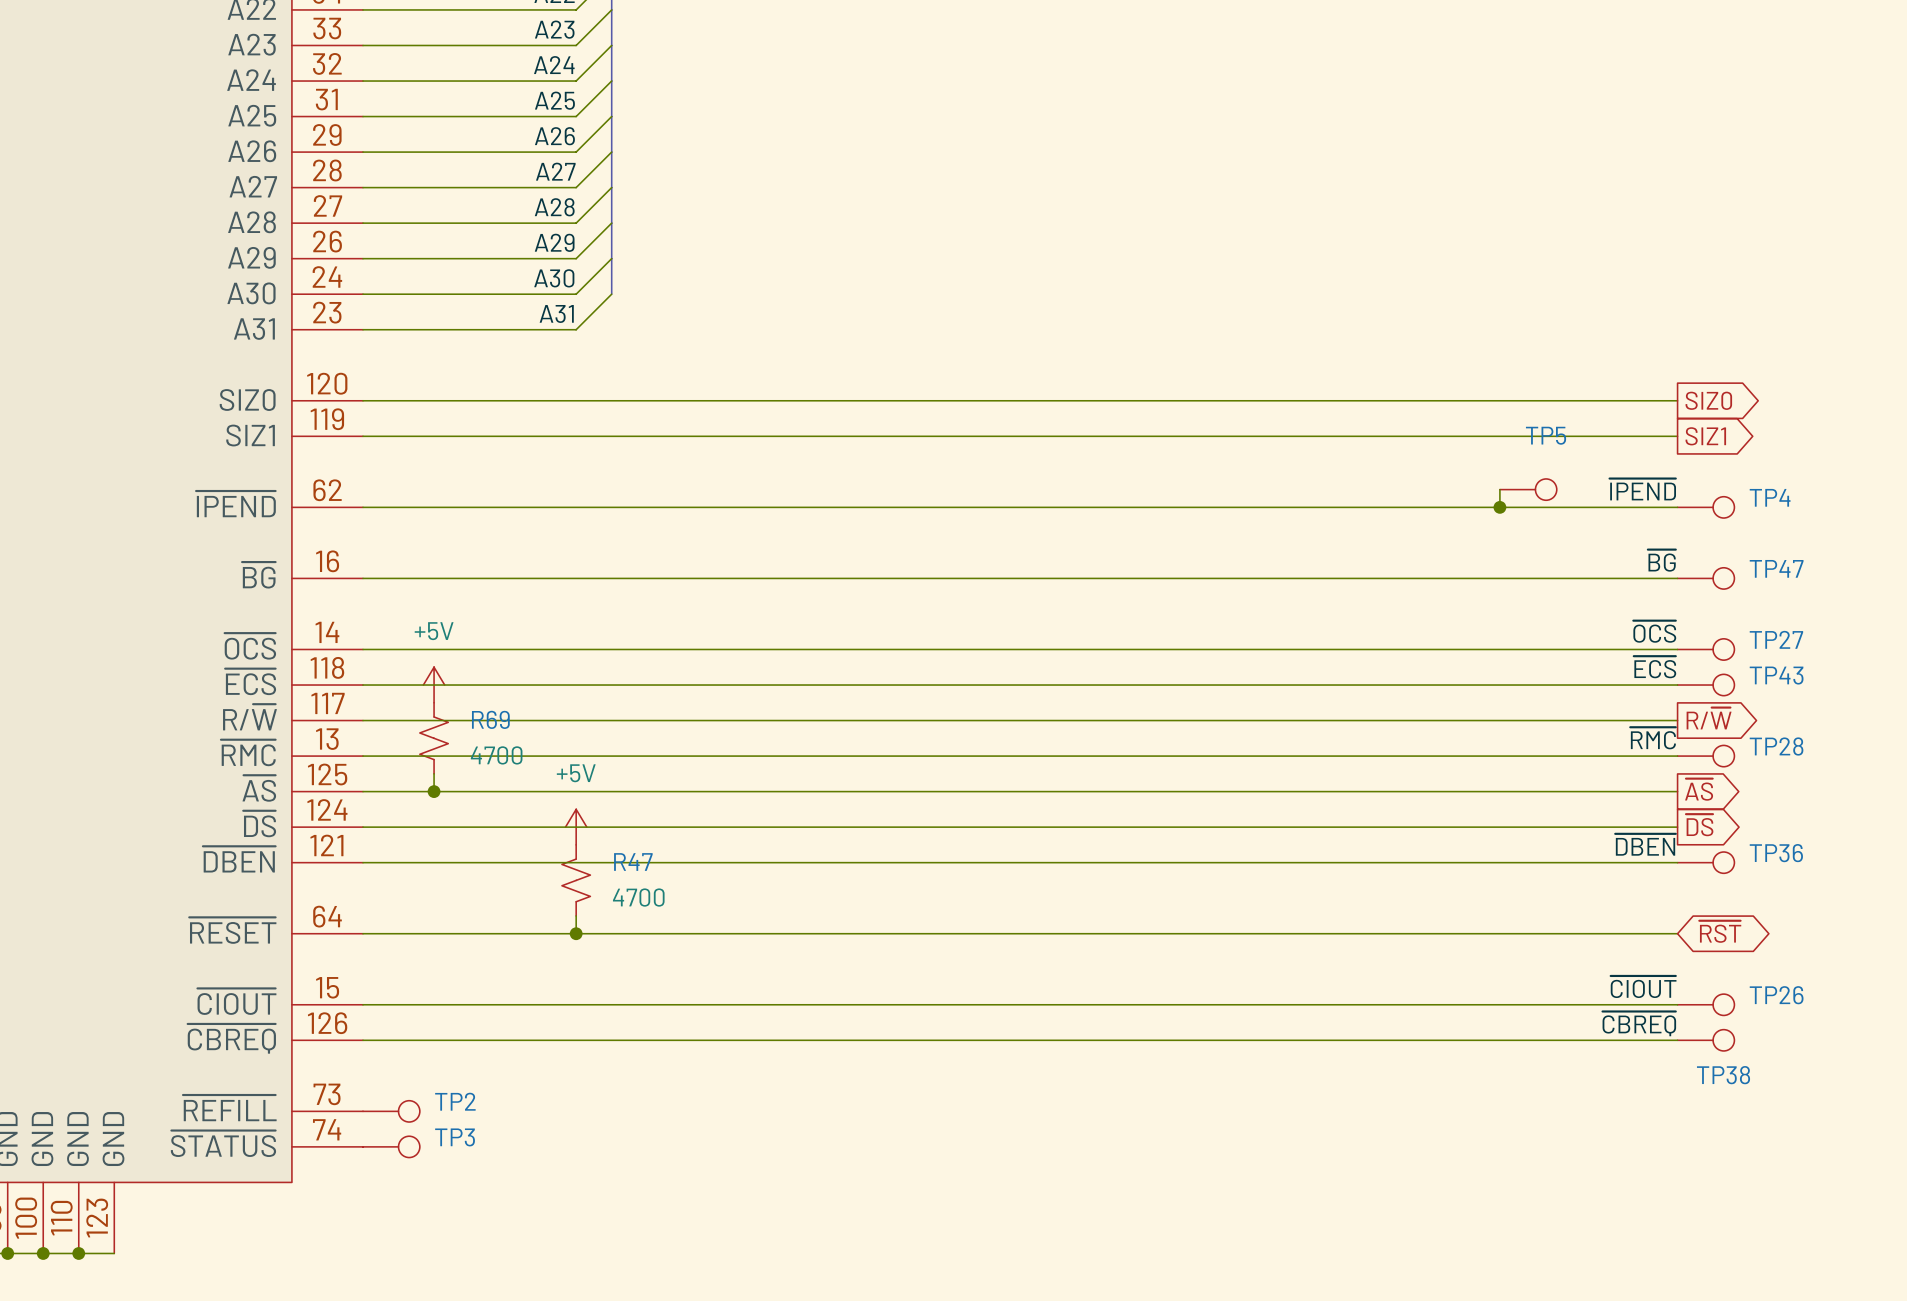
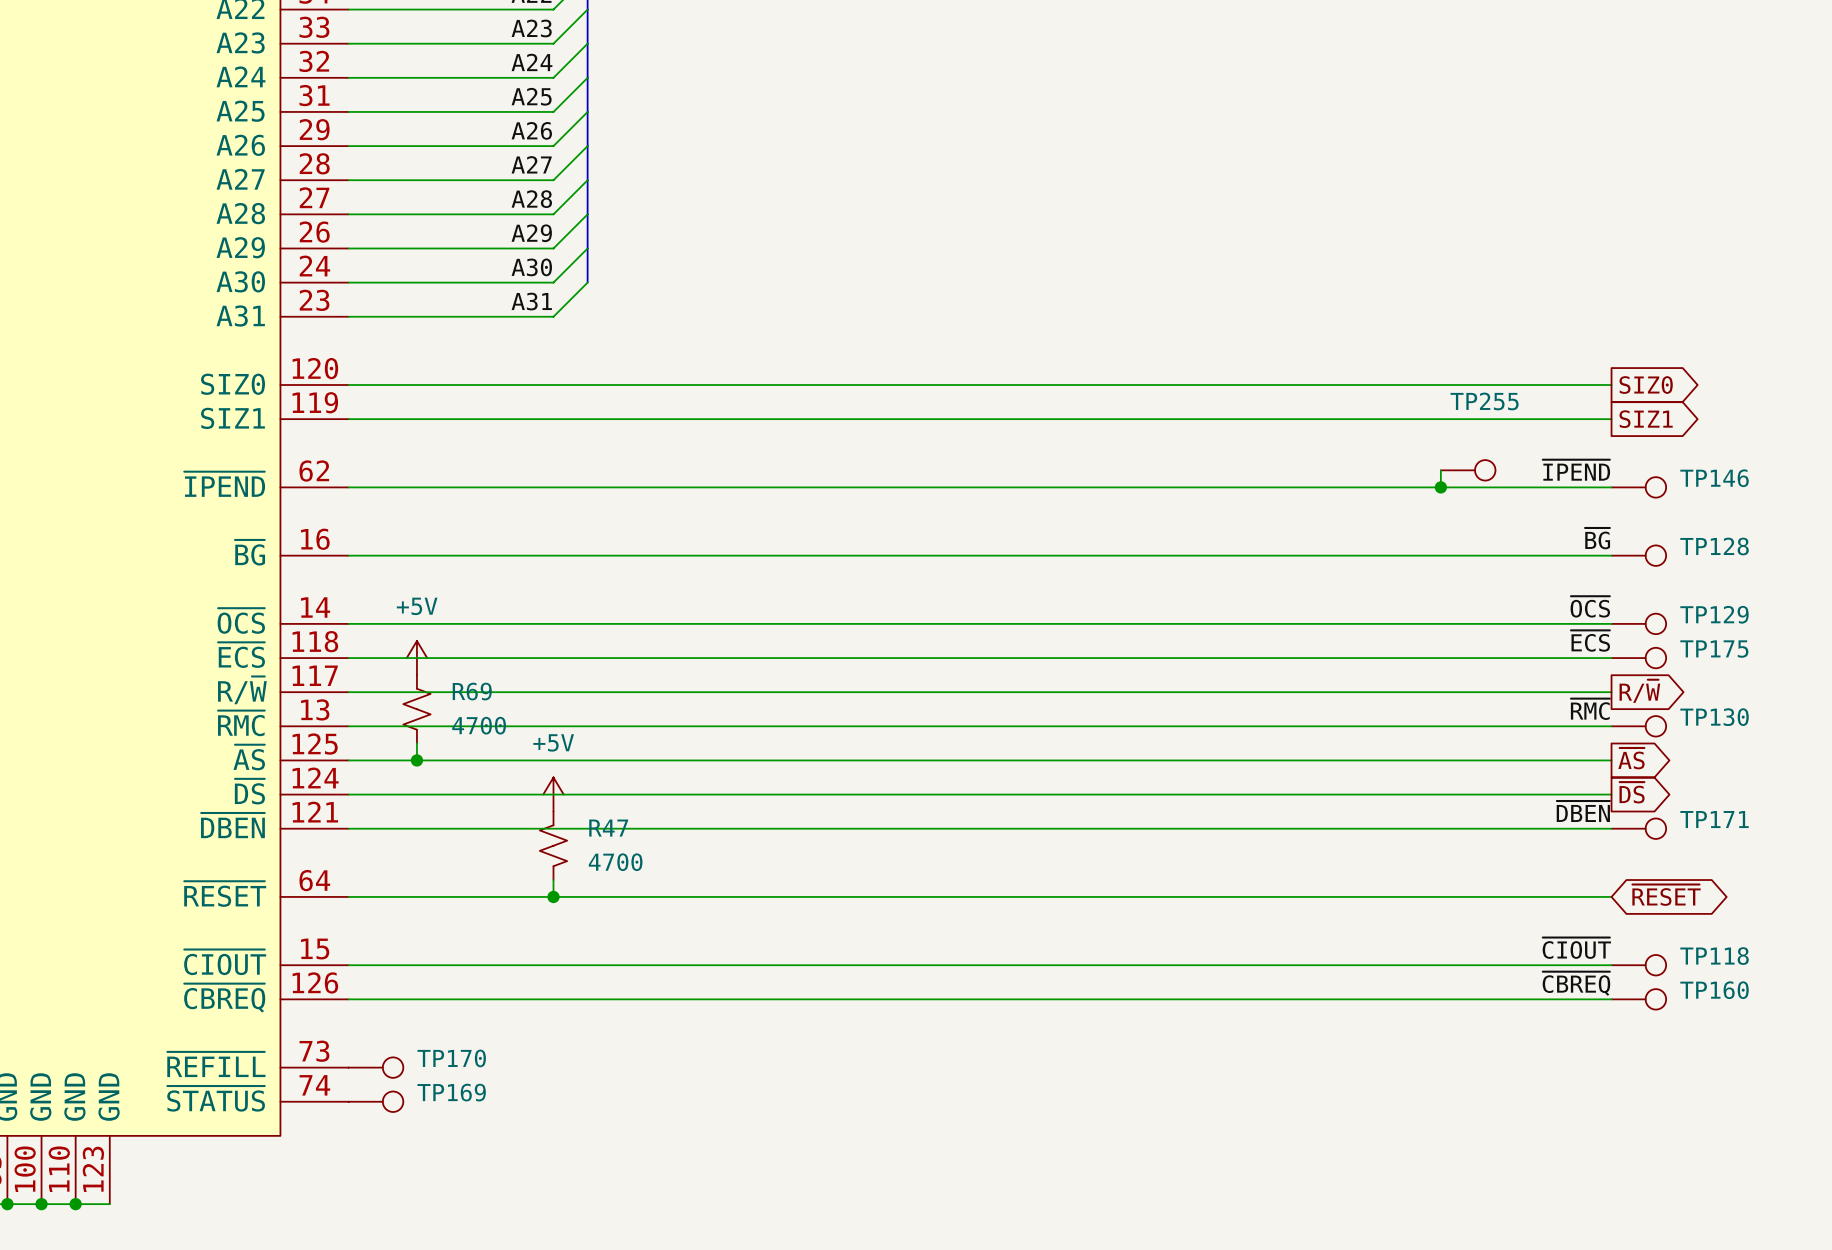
TP5 name: TP5 (1546, 435) -> TP255 (1484, 401)
TP4 name: TP4 (1770, 497) -> TP146 (1714, 478)
TP47 name: TP47 (1776, 568) -> TP128 (1714, 546)
TP27 name: TP27 (1776, 639) -> TP129 (1714, 614)
TP43 name: TP43 (1776, 675) -> TP175 (1714, 649)
TP28 name: TP28 (1776, 746) -> TP130 (1714, 717)
TP36 name: TP36 (1776, 853) -> TP171 (1714, 819)
global label: ~{RST} (1720, 931) -> ~{RESET} (1666, 895)
TP26 name: TP26 (1776, 995) -> TP118 (1714, 956)
TP38 name: TP38 (1723, 1075) -> TP160 (1714, 990)
TP2 name: TP2 (455, 1101) -> TP170 (451, 1058)
TP3 name: TP3 (455, 1137) -> TP169 (451, 1092)

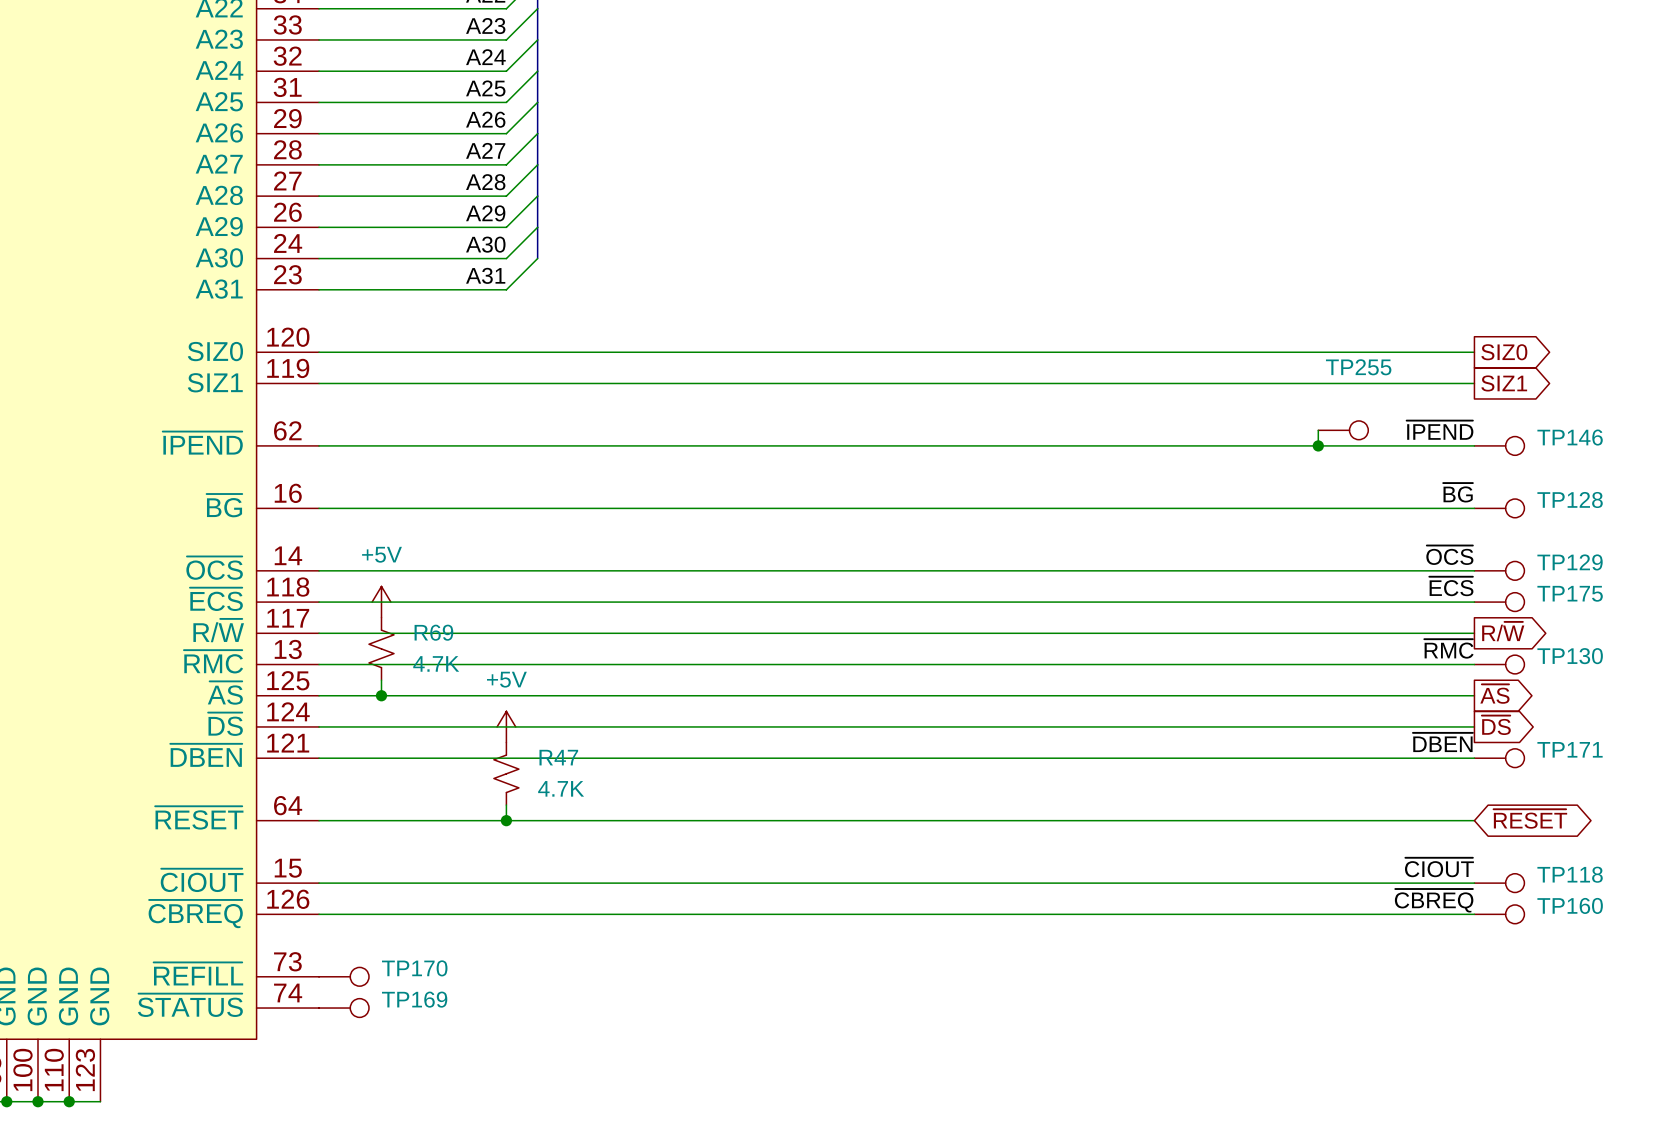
R69 value: 4700 (479, 725) -> 4.7K (436, 663)
R47 value: 4700 (615, 862) -> 4.7K (561, 788)

